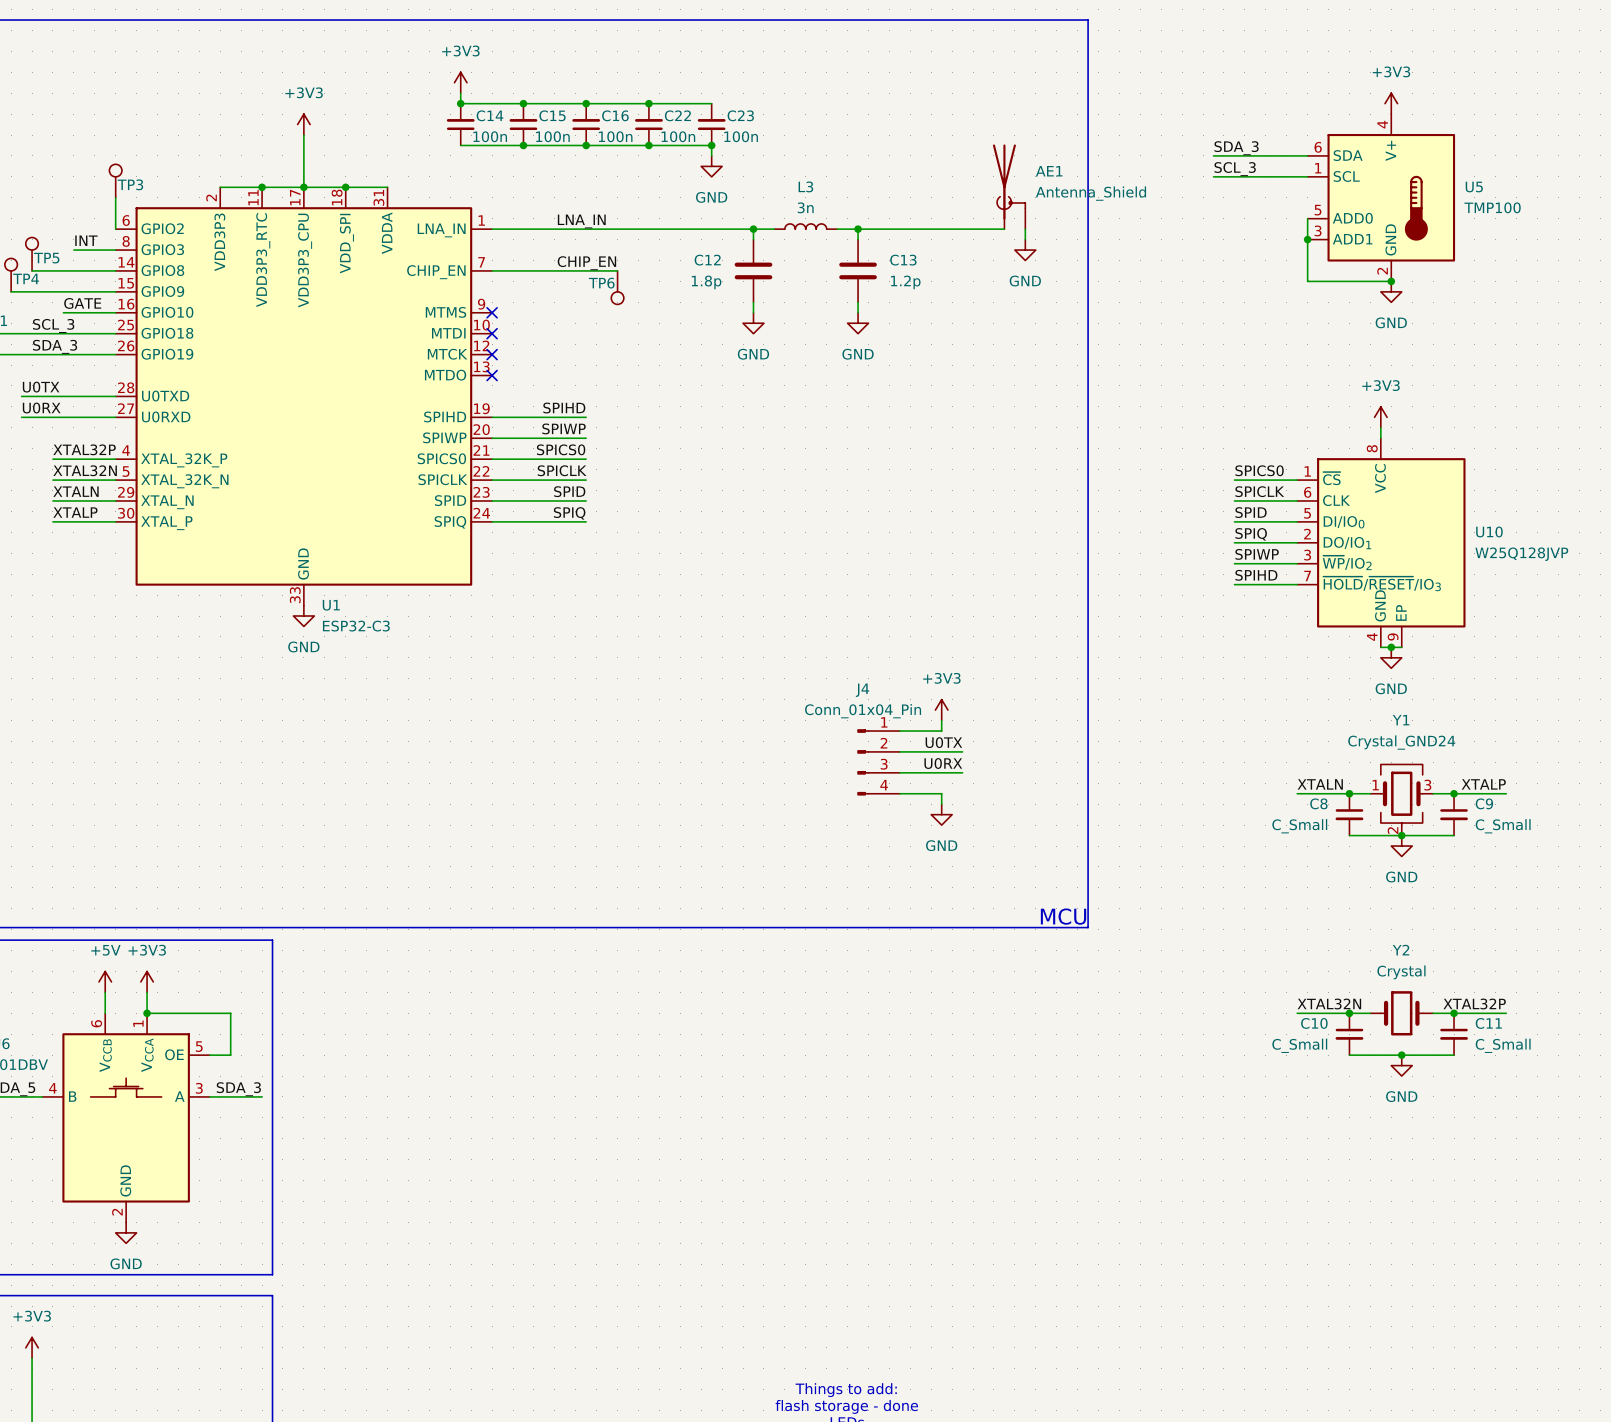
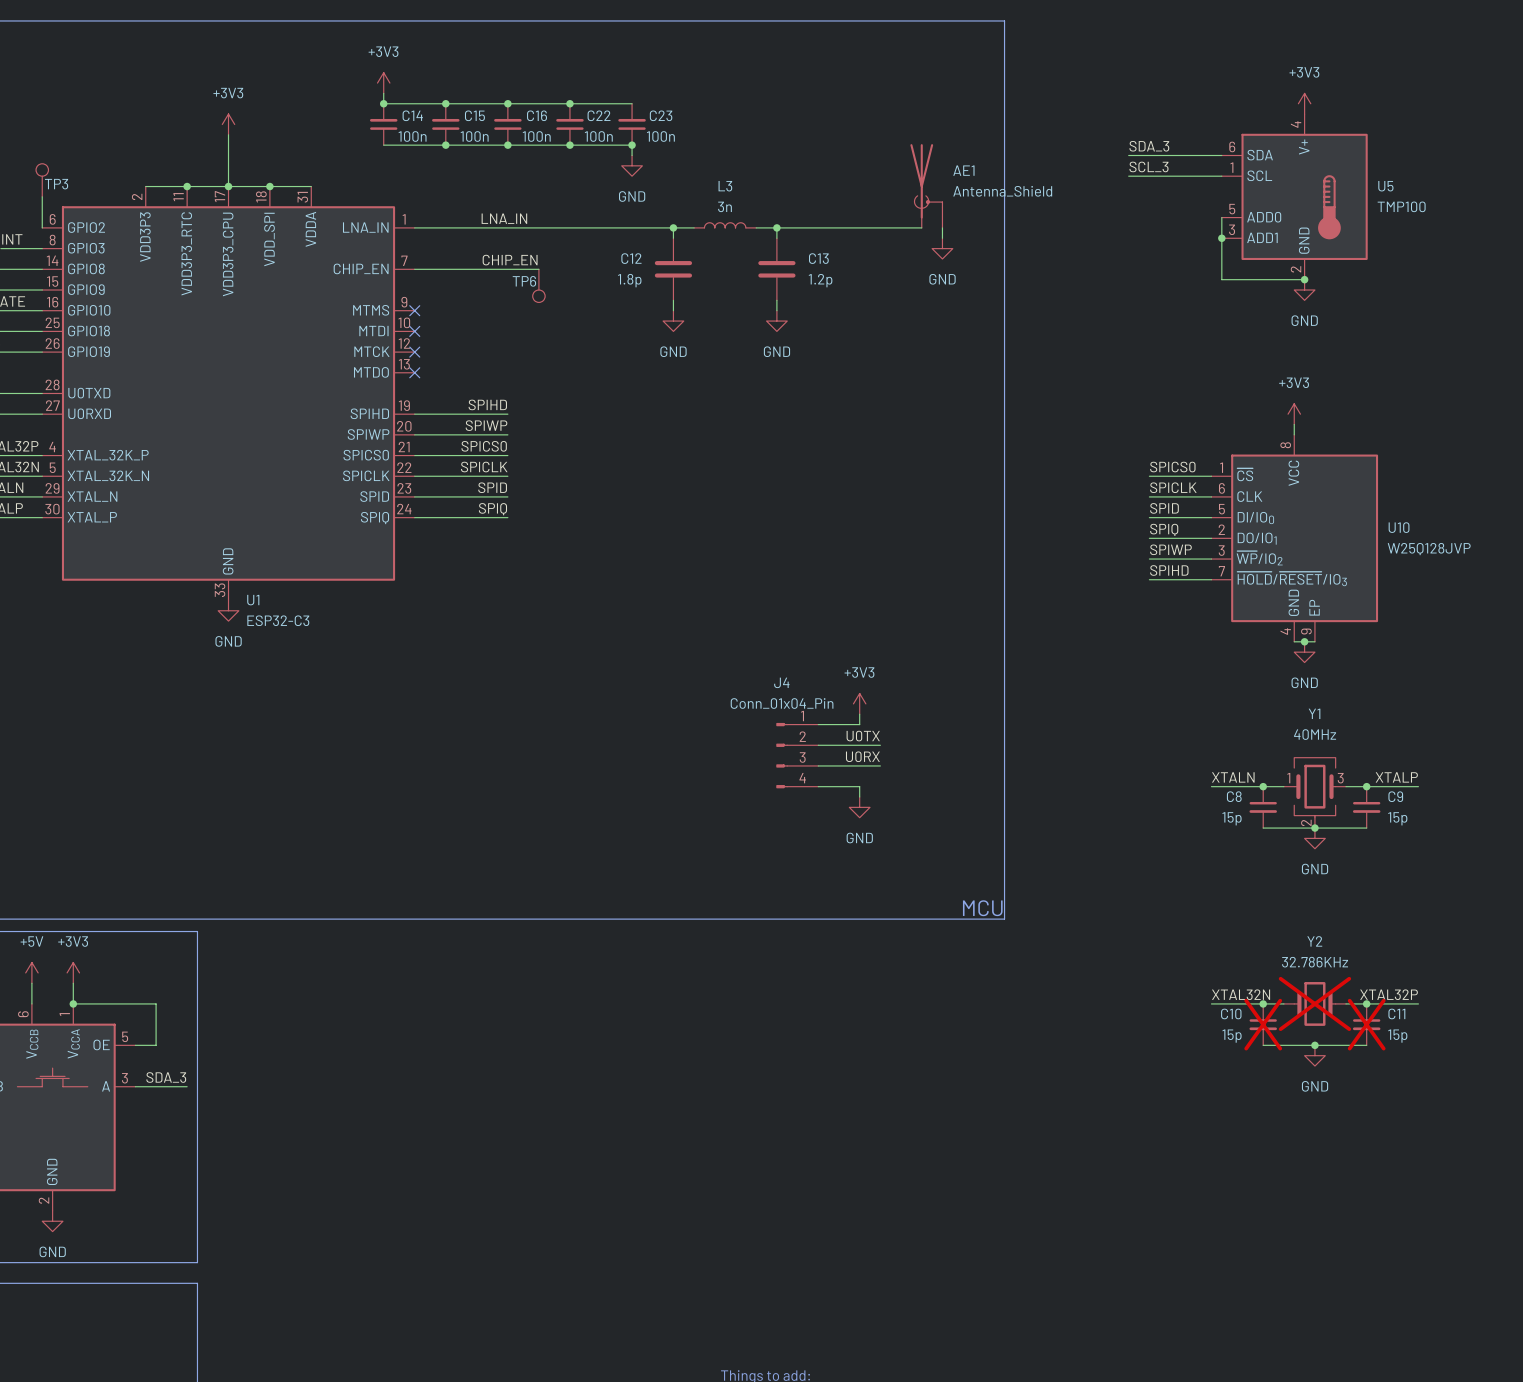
Y1 value: Crystal_GND24 (1401, 742) -> 40MHz (1315, 734)
C8 value: C_Small (1299, 826) -> 15p (1232, 818)
C9 value: C_Small (1503, 826) -> 15p (1397, 818)
Y2 value: Crystal (1401, 972) -> 32.786KHz (1315, 962)
Y2 do-not-place cross: none -> (1314, 1003)
C10 do-not-place cross: none -> (1263, 1024)
C11 do-not-place cross: none -> (1366, 1024)
C10 value: C_Small (1299, 1045) -> 15p (1232, 1036)
C11 value: C_Small (1503, 1045) -> 15p (1397, 1036)

